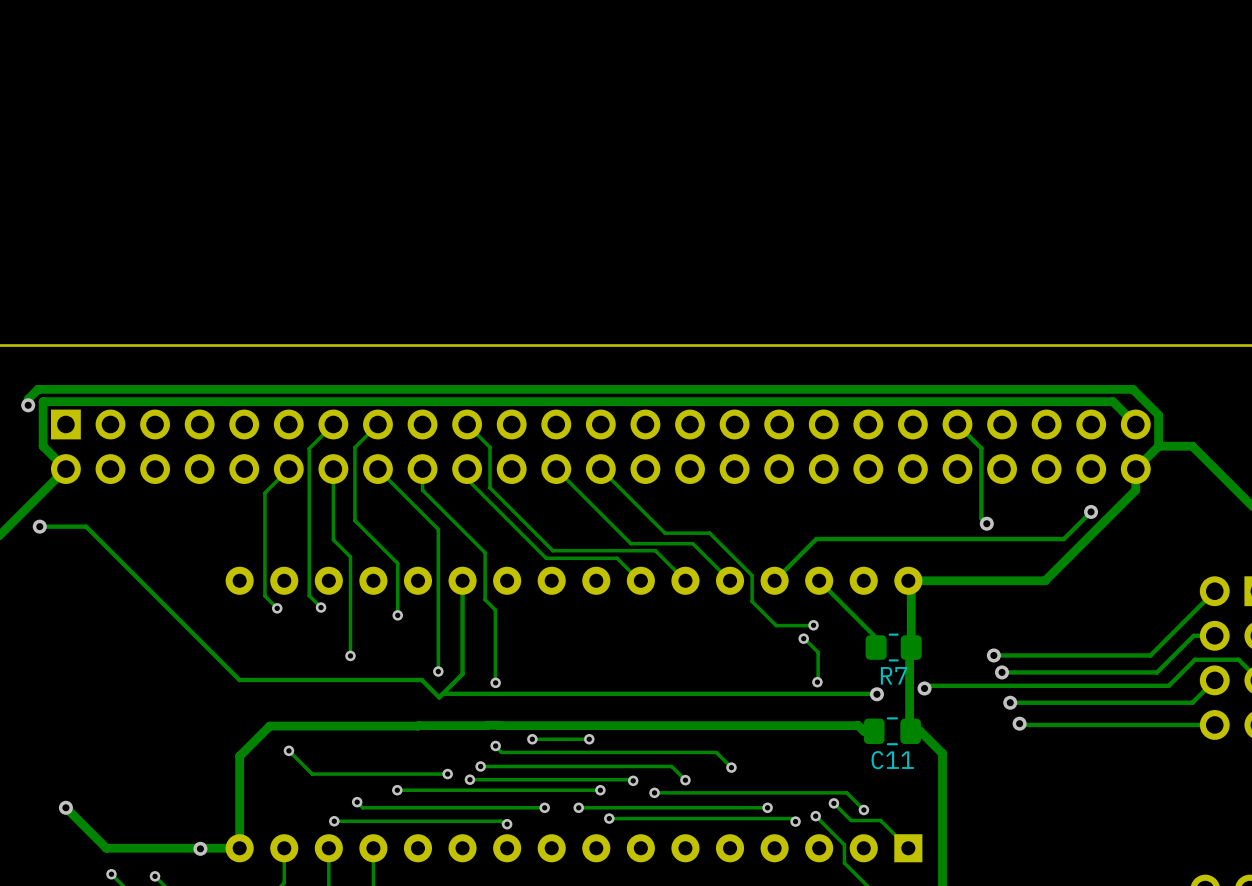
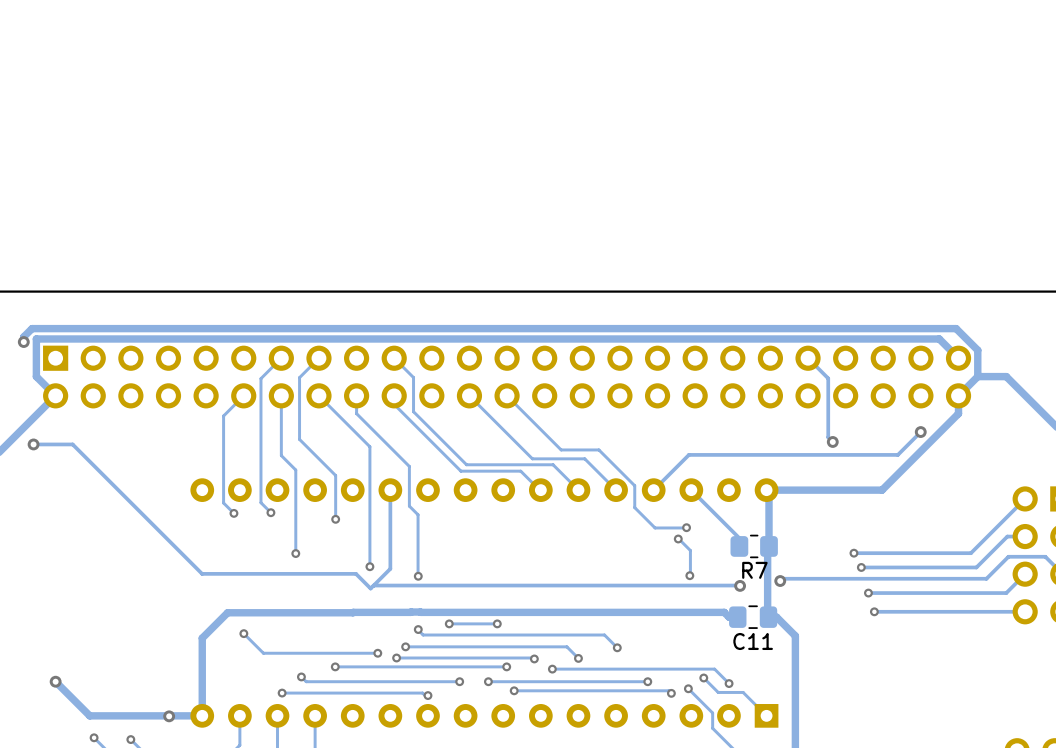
via: (993, 655) -> none
track: (1011, 655) (993, 655) -> none
via: none -> (853, 553)
via: (1002, 672) -> none
track: (1020, 672) (1002, 672) -> none
via: none -> (861, 567)
via: (1010, 702) -> none
track: (1029, 702) (1010, 702) -> none
via: none -> (868, 593)
track: (1019, 723) (1036, 724) -> none
via: (1019, 723) -> none
via: none -> (874, 611)

